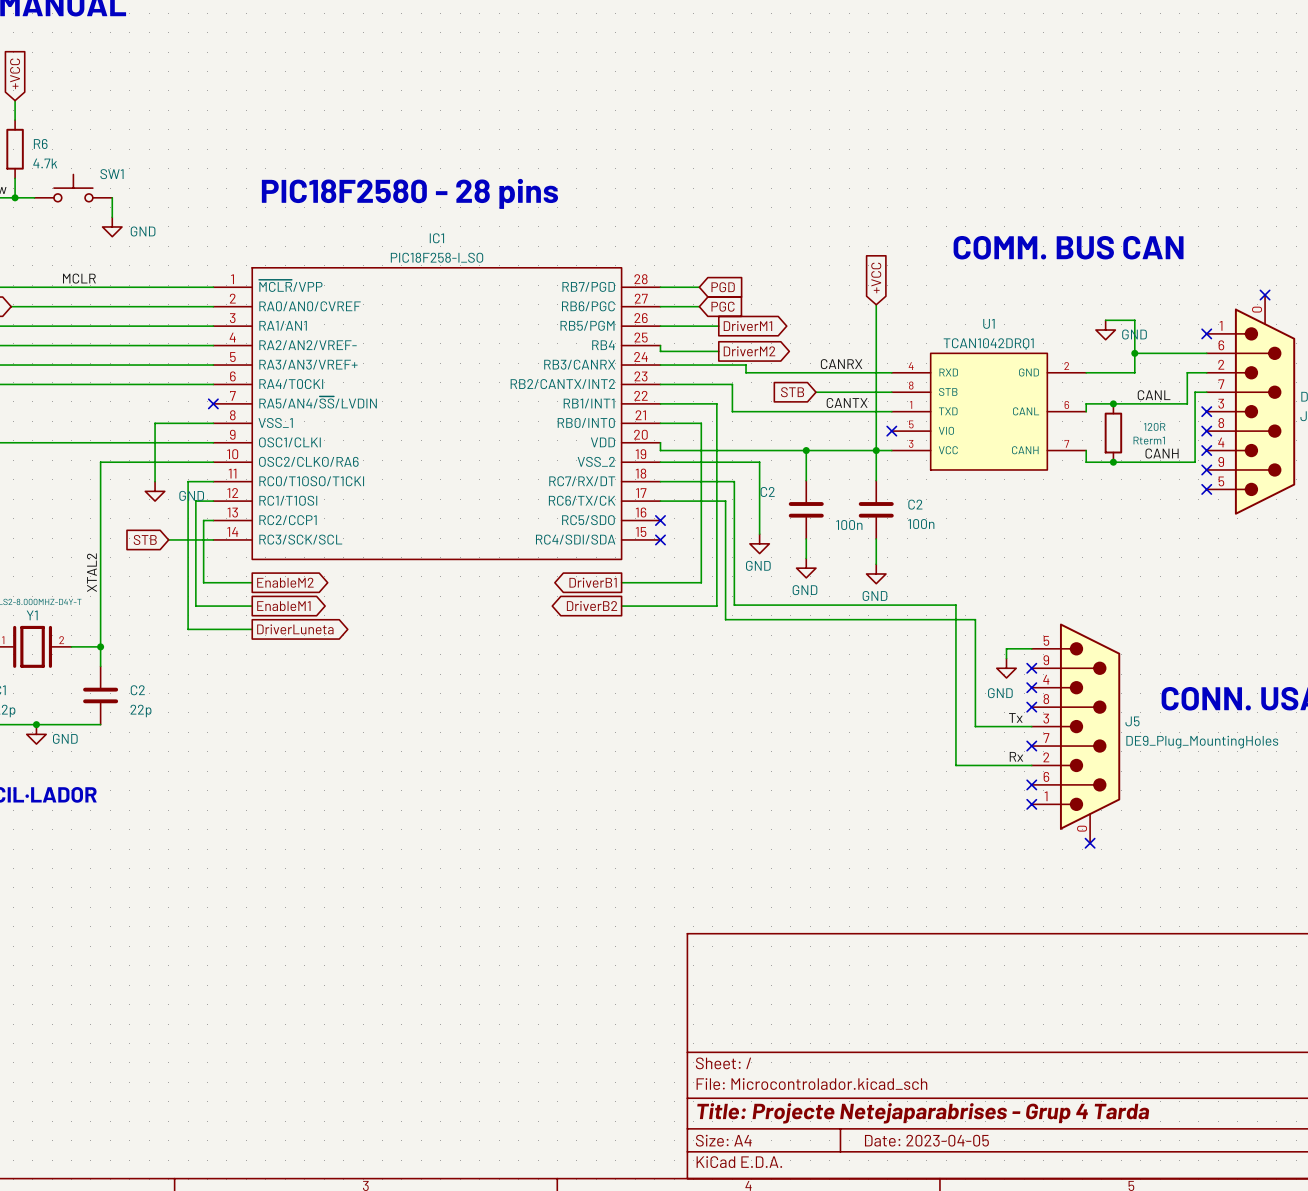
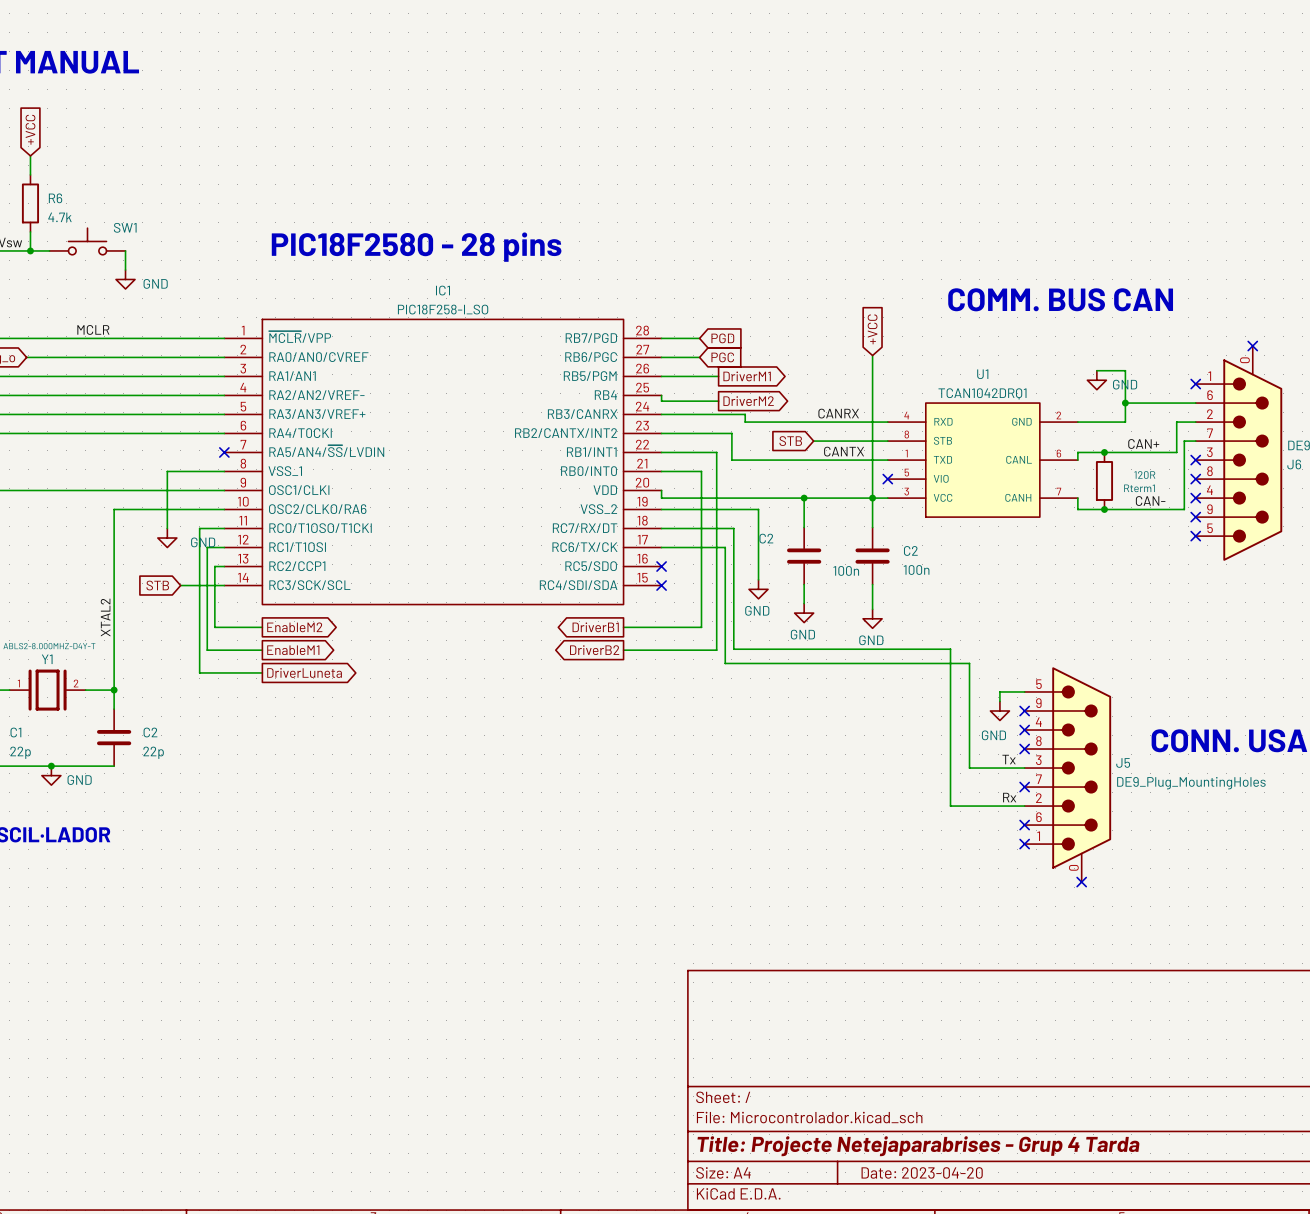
label: CANL (1154, 395) -> CAN+ (1143, 444)
label: CANH (1162, 453) -> CAN- (1150, 501)
title block: Date: 2023-04-05 (926, 1140) -> Date: 2023-04-20 (922, 1172)

